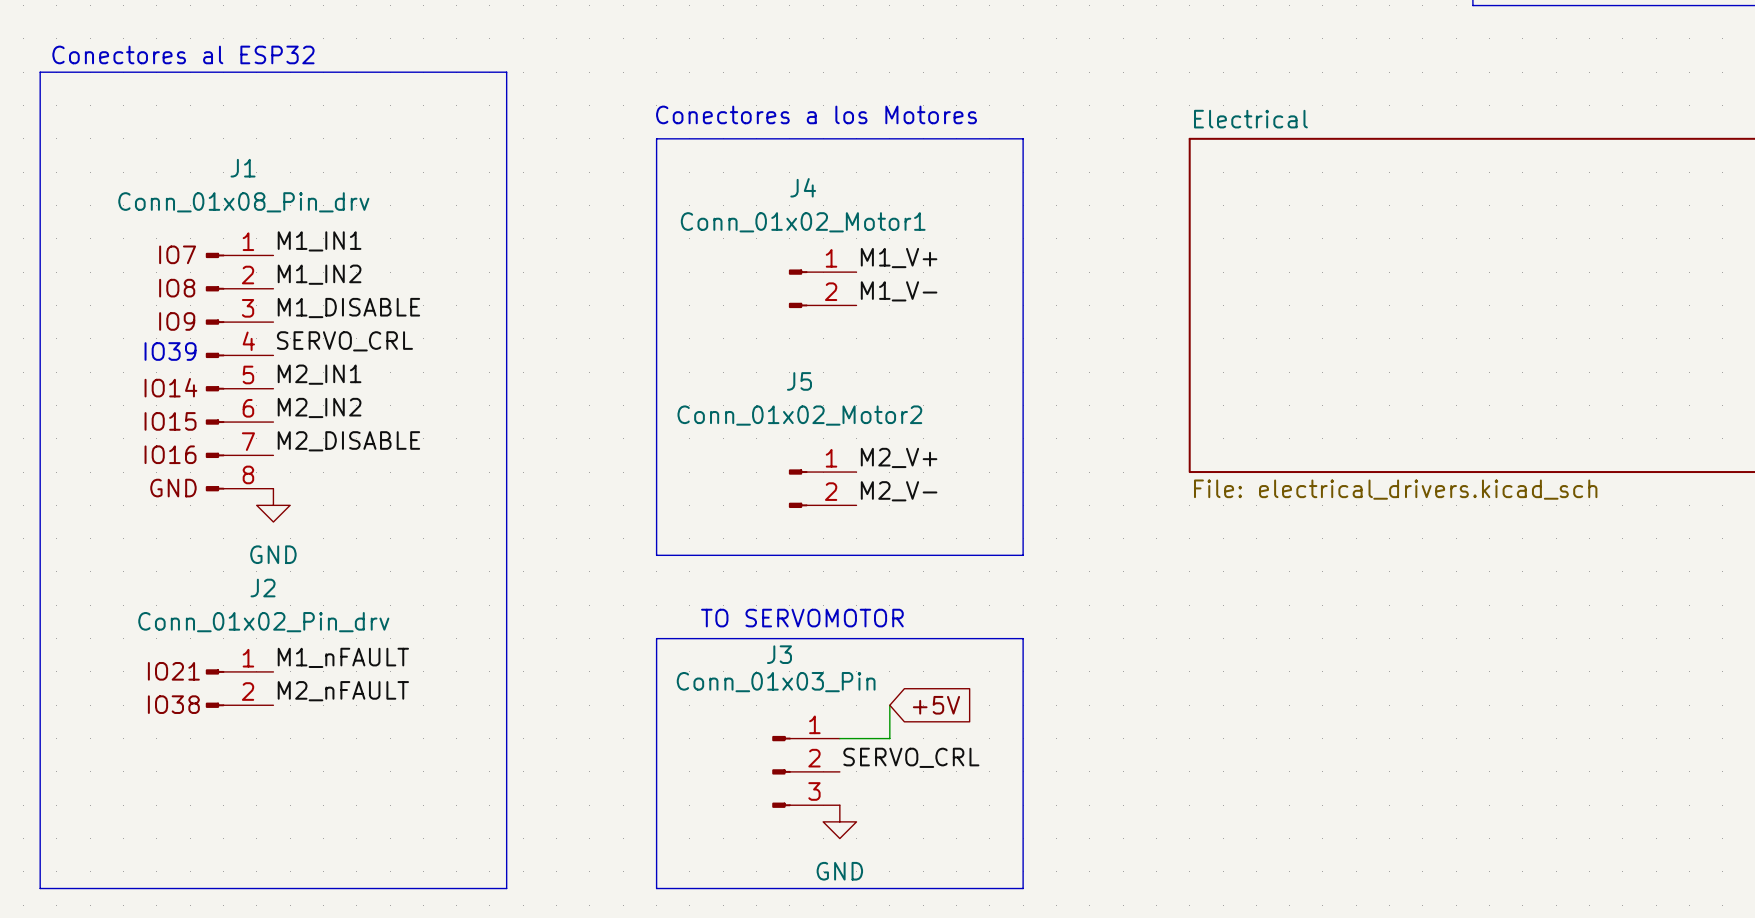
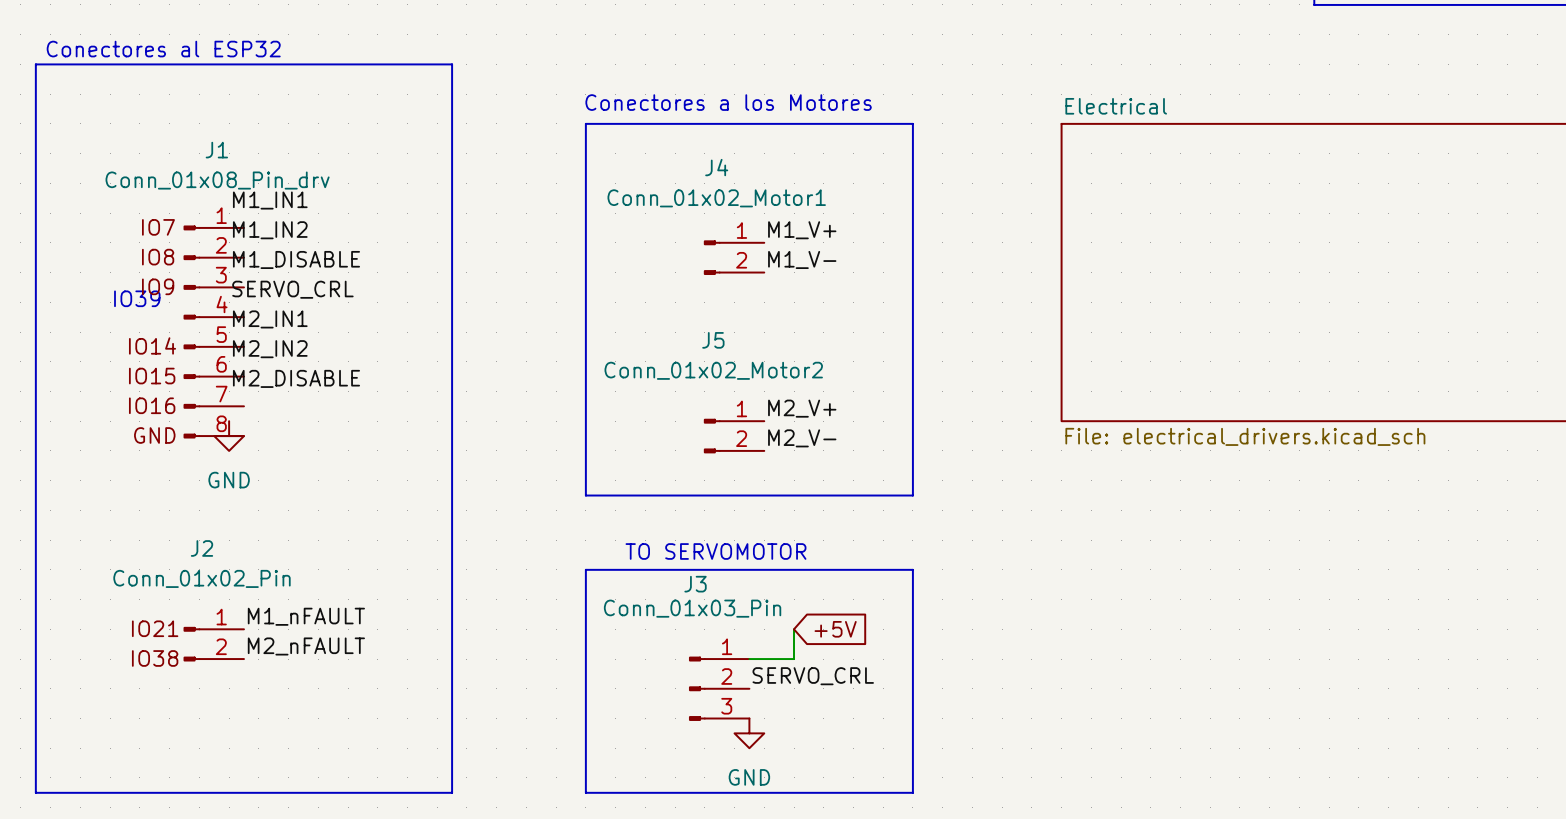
label position: M1_IN1 (319, 241) -> M1_IN1 (270, 200)
label position: M1_IN2 (319, 274) -> M1_IN2 (270, 230)
label position: M1_DISABLE (348, 308) -> M1_DISABLE (296, 259)
label position: SERVO_CRL (344, 341) -> SERVO_CRL (292, 289)
text position: IO39 (170, 351) -> IO39 (137, 298)
label position: M2_IN1 (319, 374) -> M2_IN1 (270, 319)
label position: M2_IN2 (319, 407) -> M2_IN2 (270, 349)
label position: M2_DISABLE (348, 441) -> M2_DISABLE (296, 378)
power symbol position: GND (273, 505) -> GND (229, 436)
J2 name position: J2 (263, 588) -> J2 (201, 548)
J2 value: Conn_01x02_Pin_drv (263, 622) -> Conn_01x02_Pin (201, 578)
label: M1_nFAULT (343, 657) -> none
J2 position: (239, 688) -> (213, 644)
label: M2_nFAULT (343, 691) -> M1_nFAULT (306, 616)
label: none -> M2_nFAULT (306, 646)

